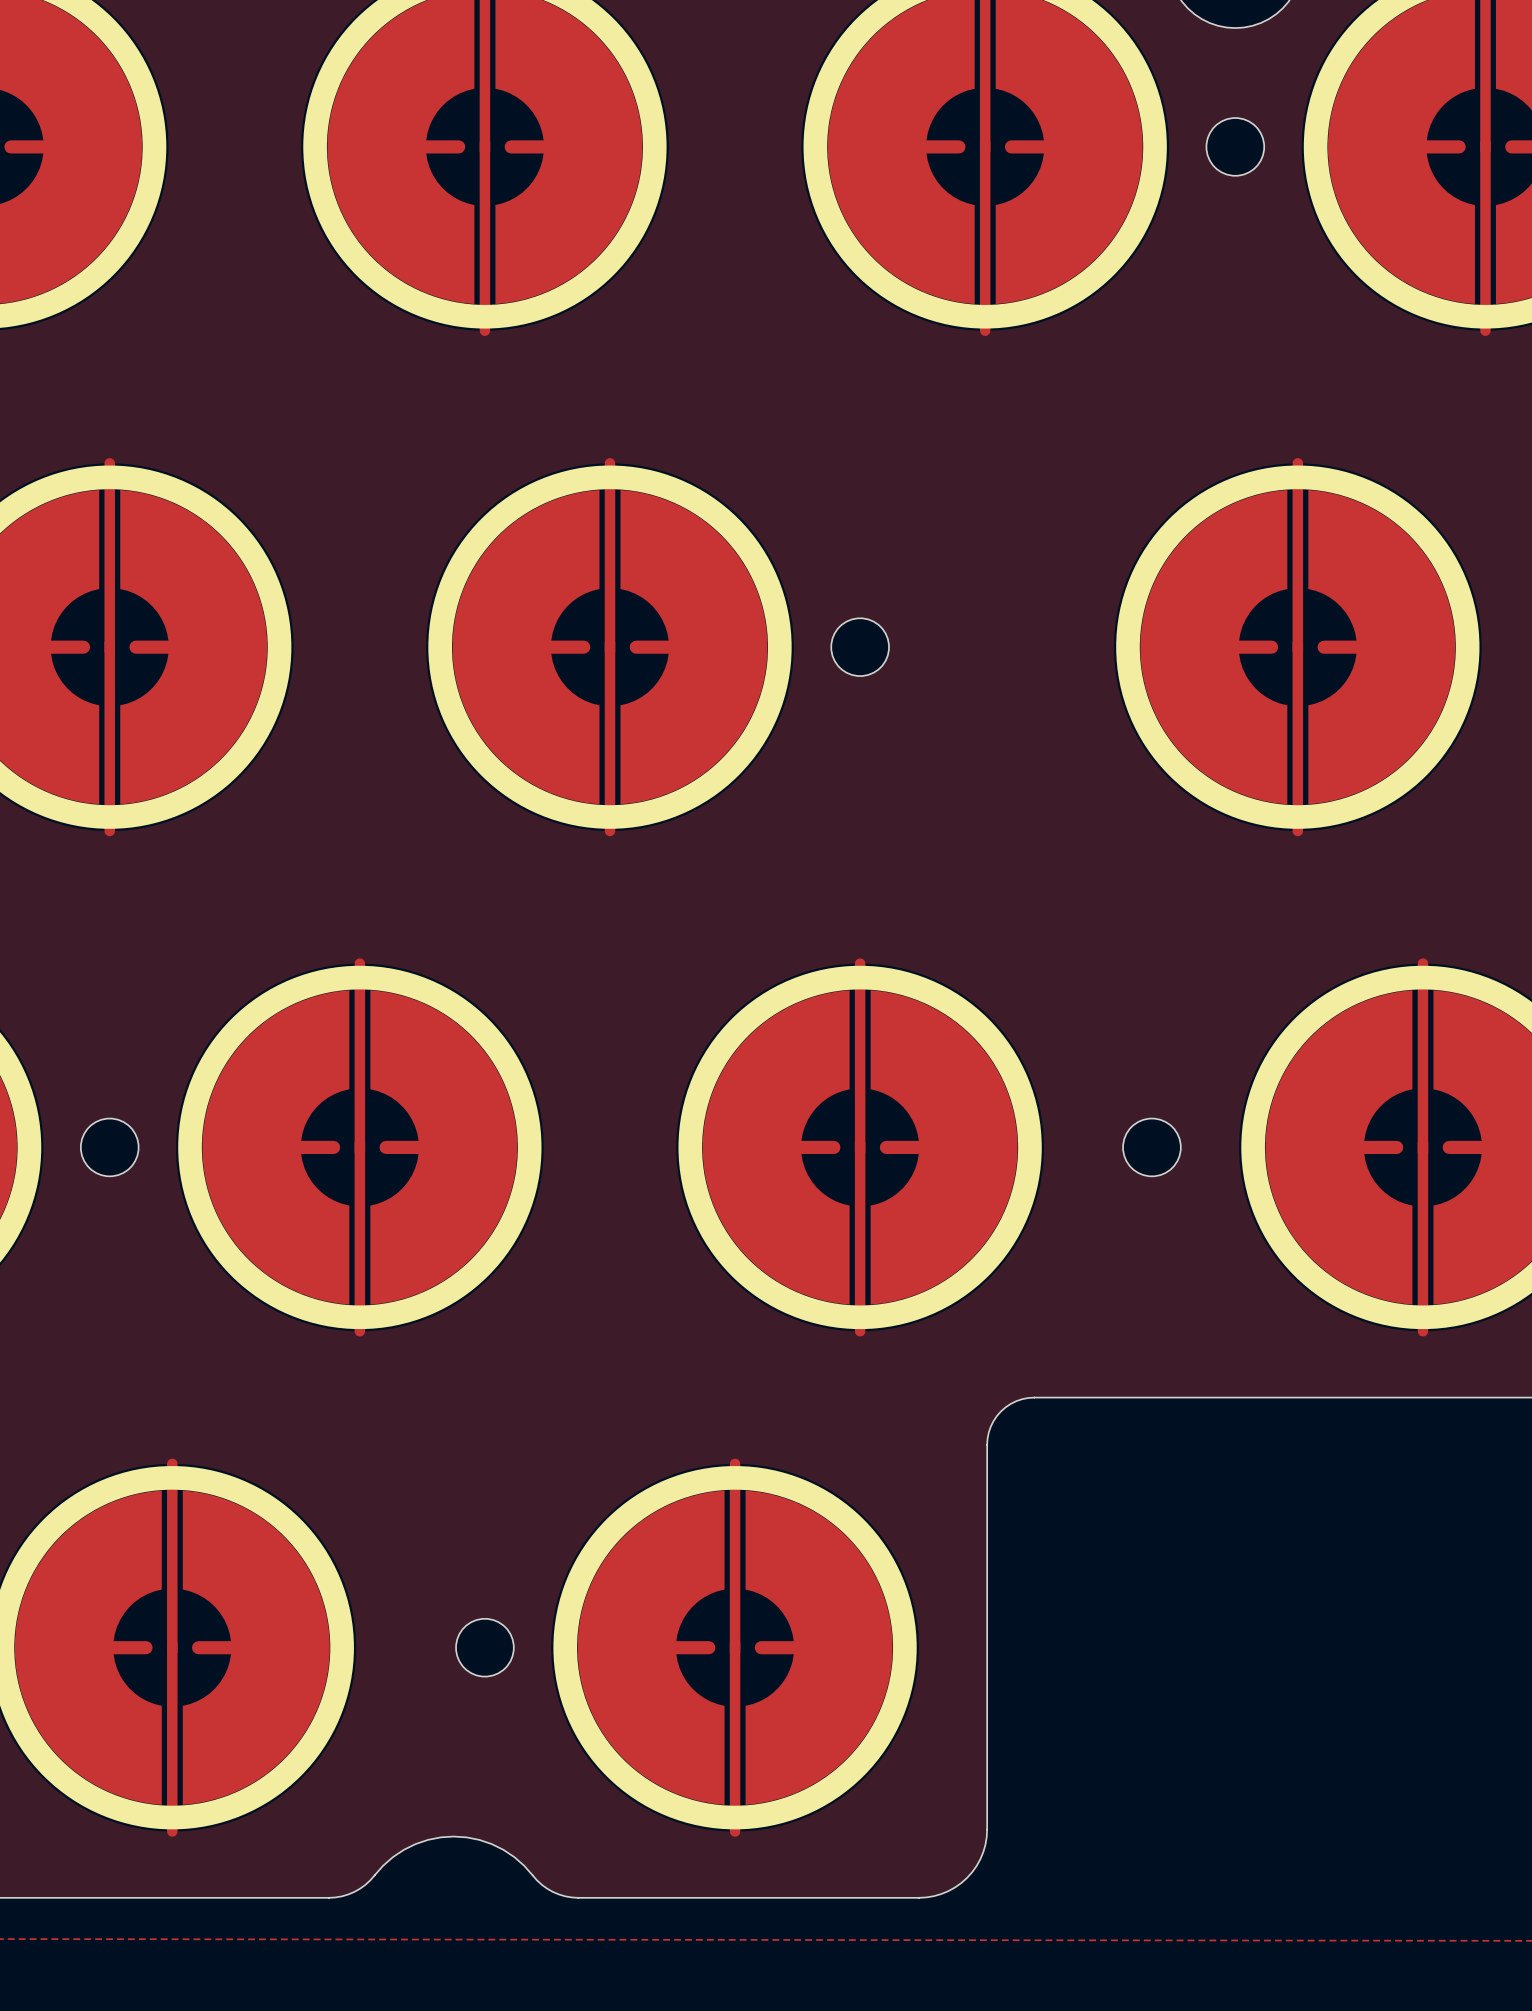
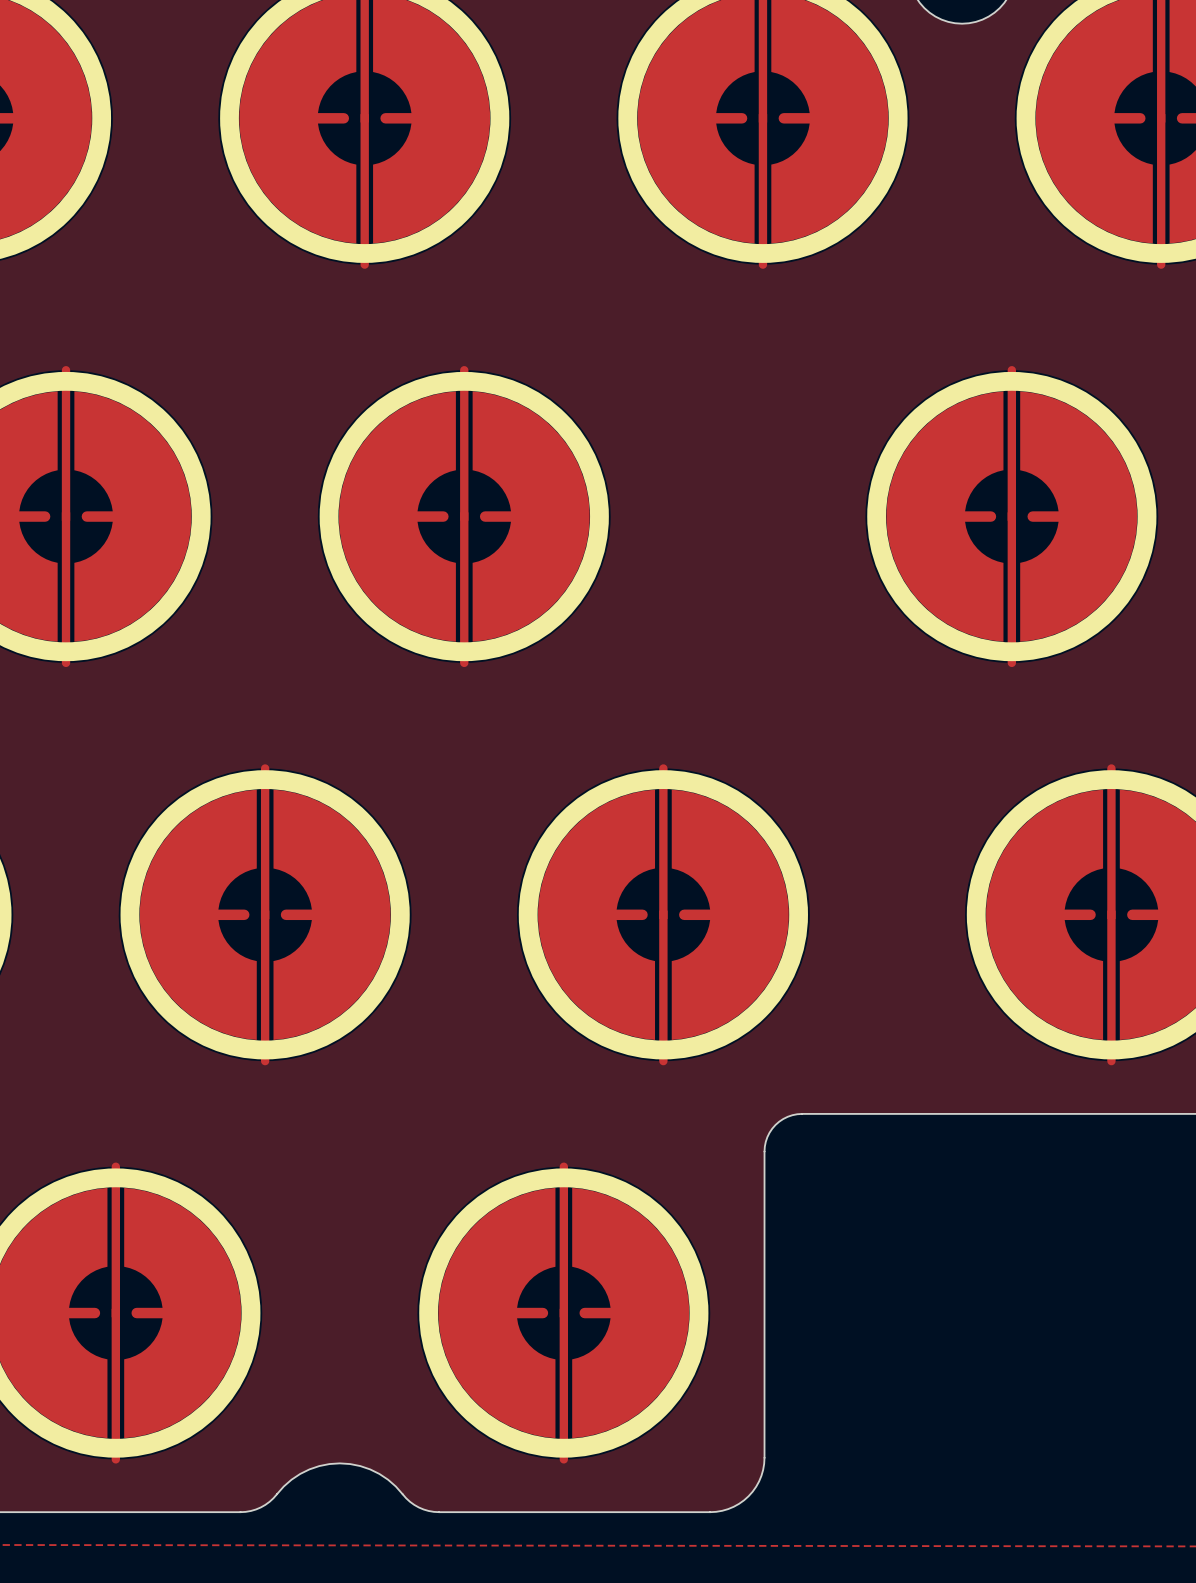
part: (1235, 146) -> none
part: (860, 647) -> none
part: (109, 1147) -> none
part: (1151, 1147) -> none
part: (484, 1647) -> none

